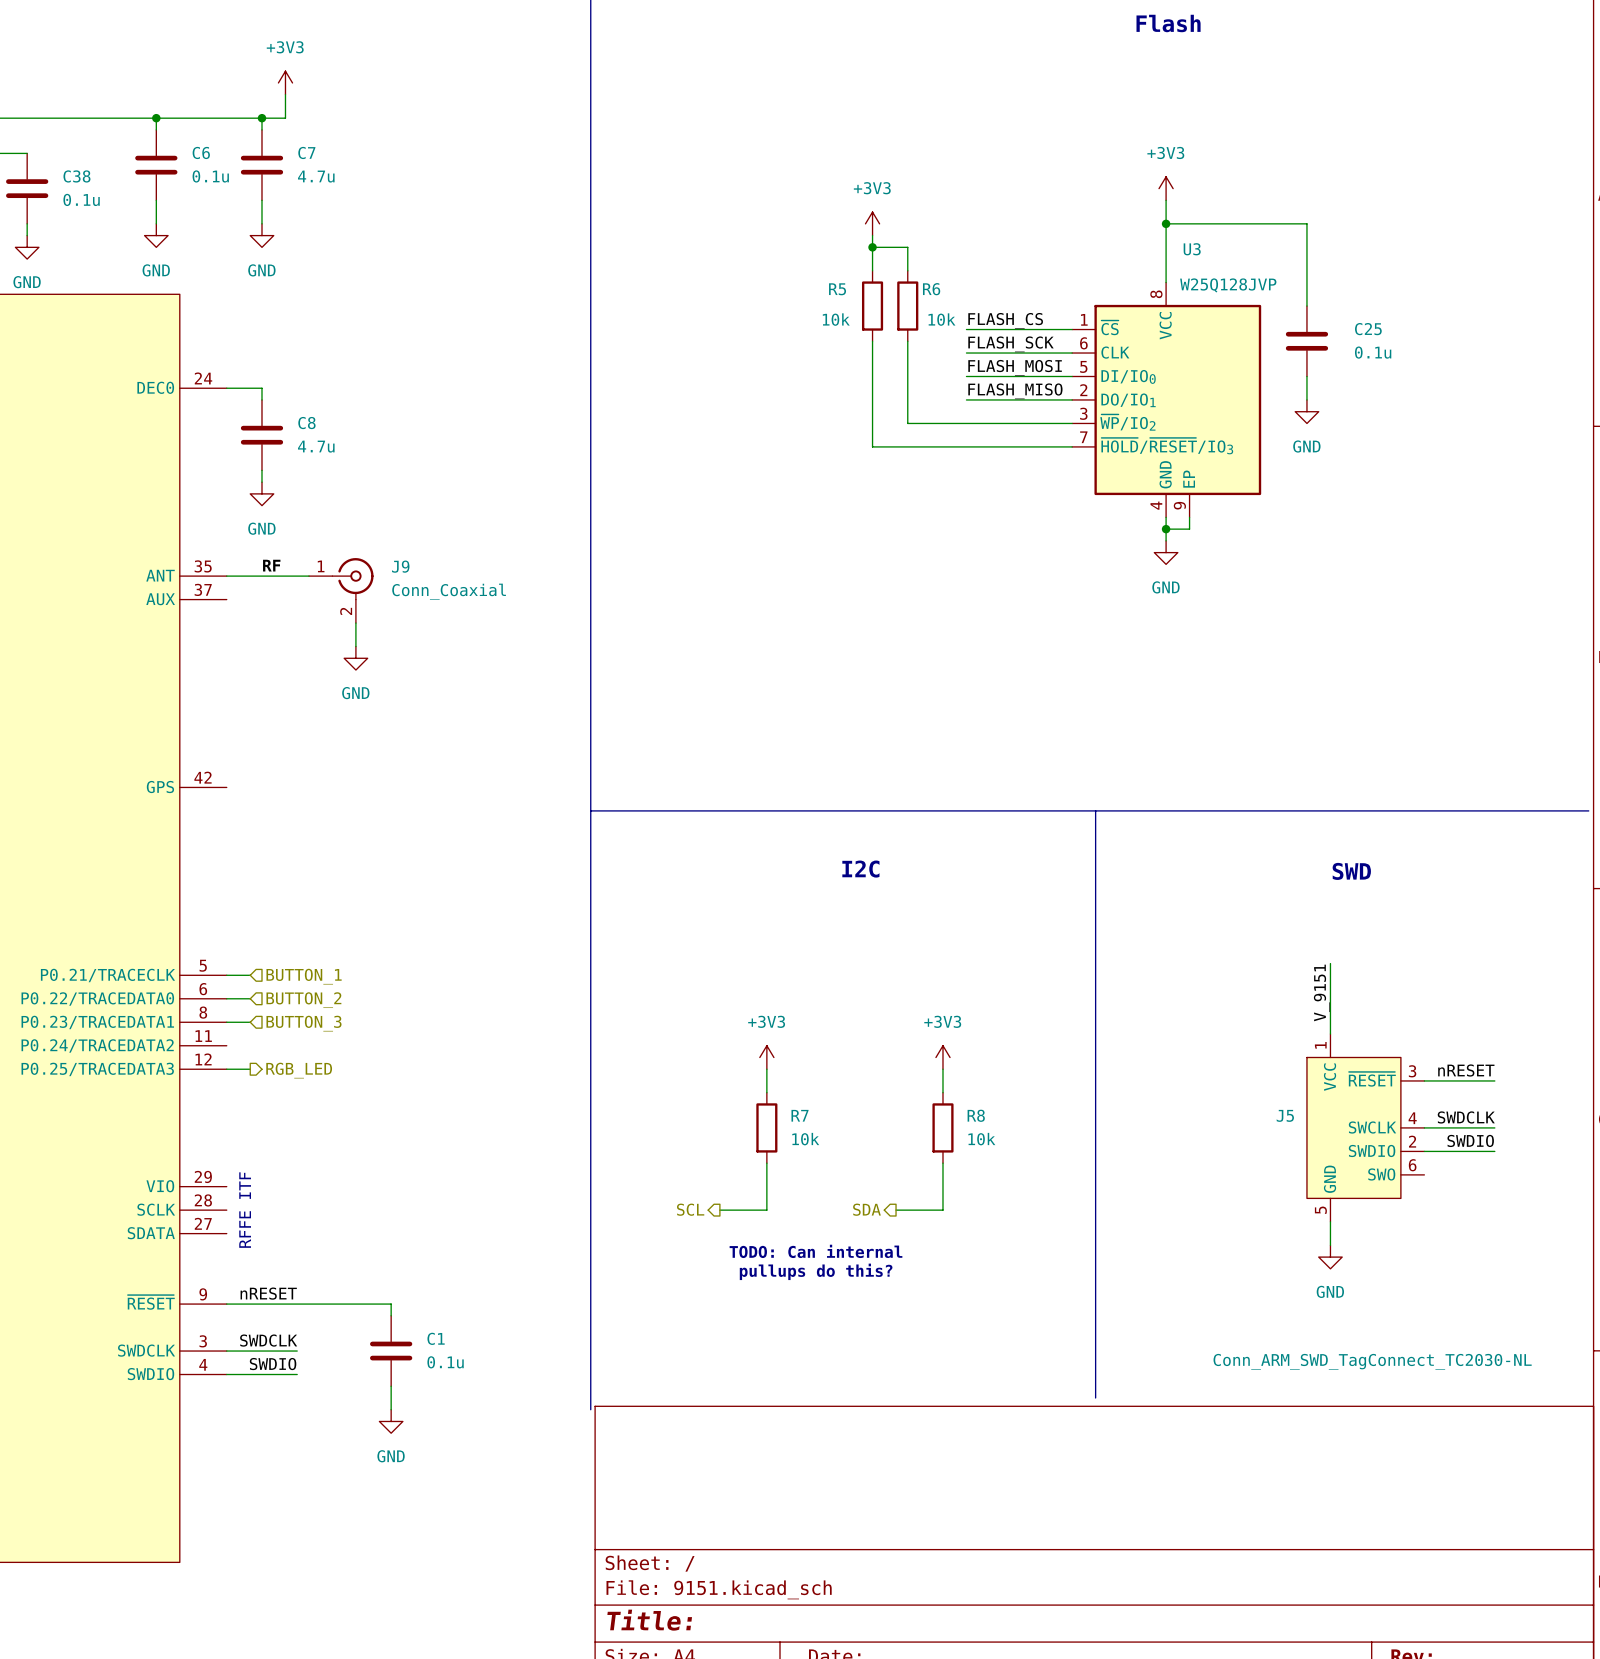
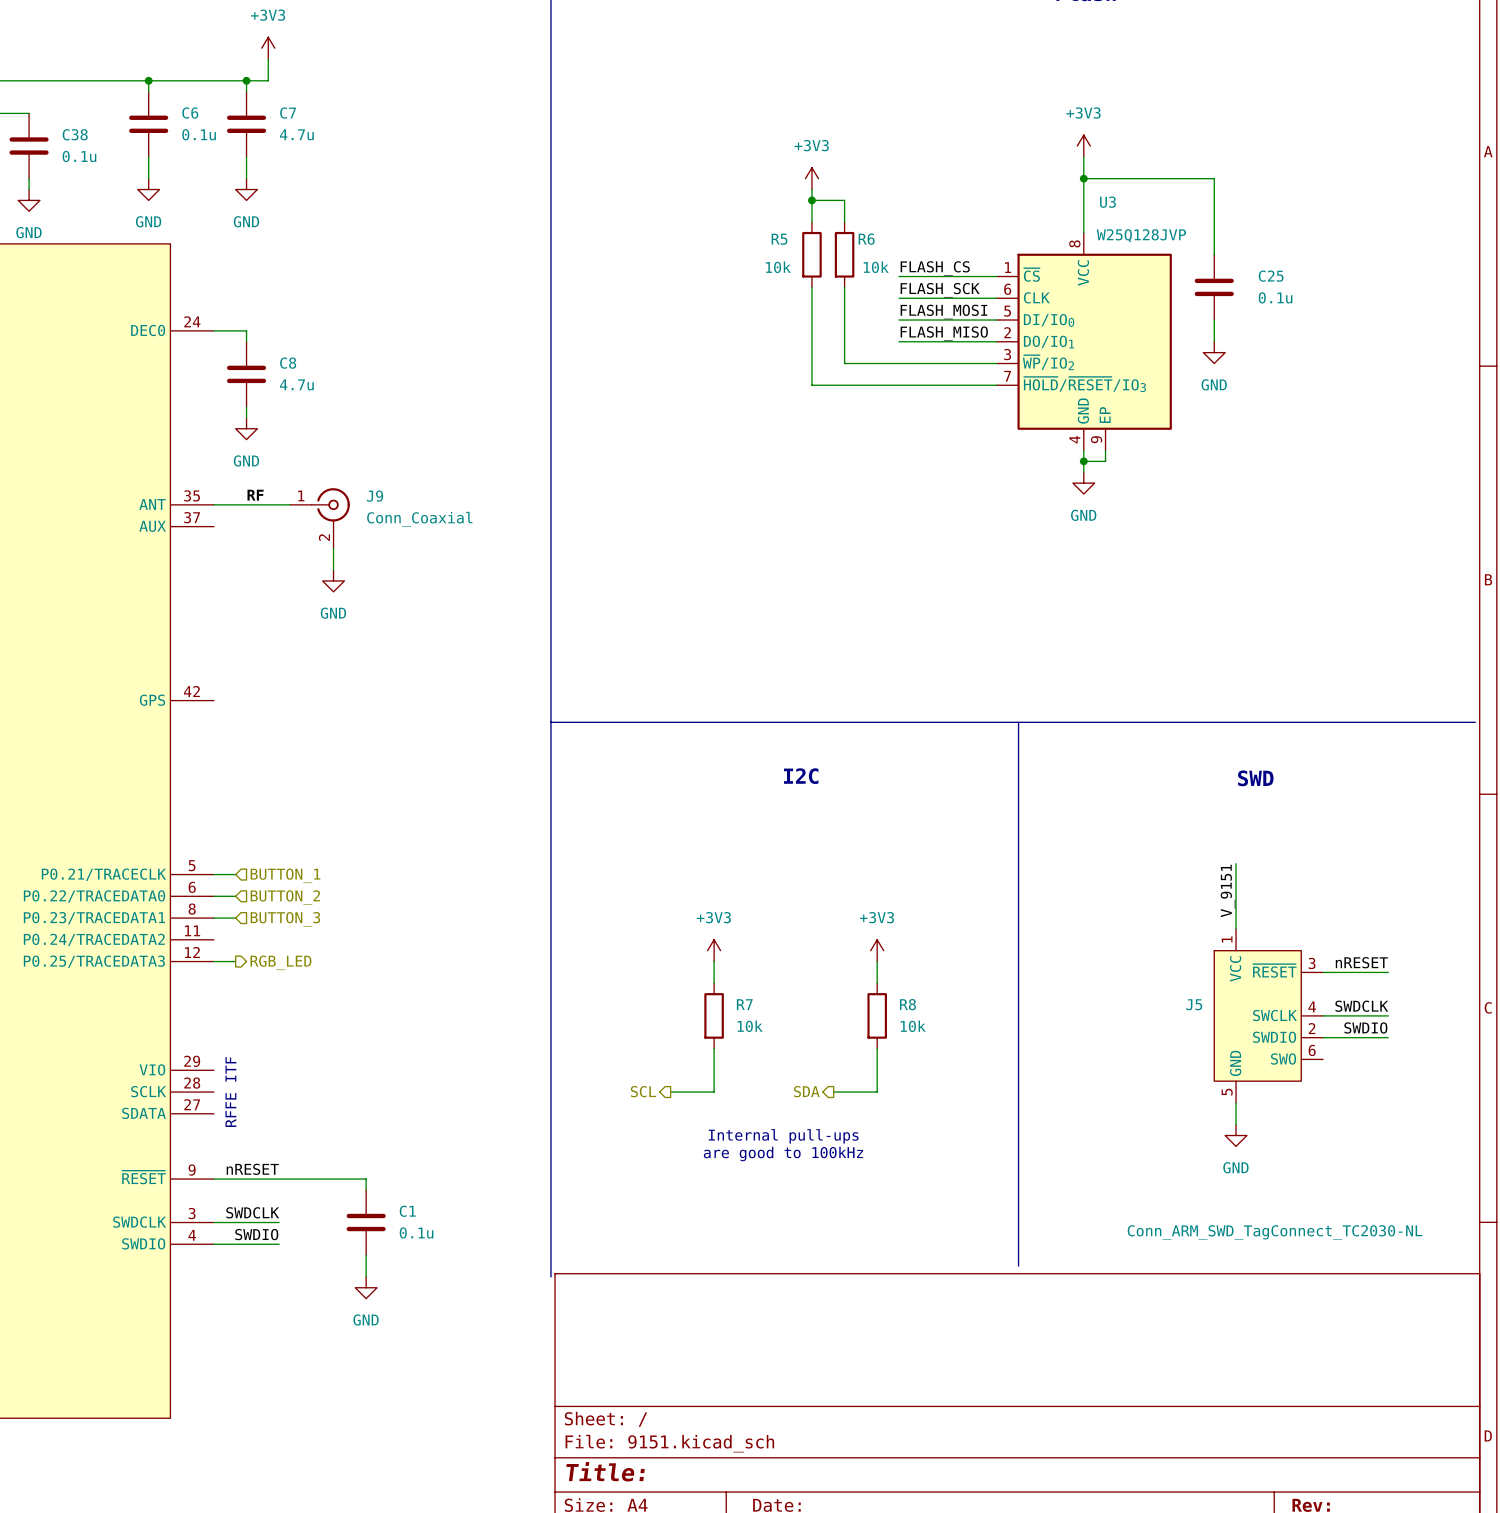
text: TODO: Can internal (815, 1251) -> none
text: none -> Internal pull-ups (783, 1136)
text: pullups do this? (816, 1271) -> none
text: none -> are good to 100kHz (783, 1153)

